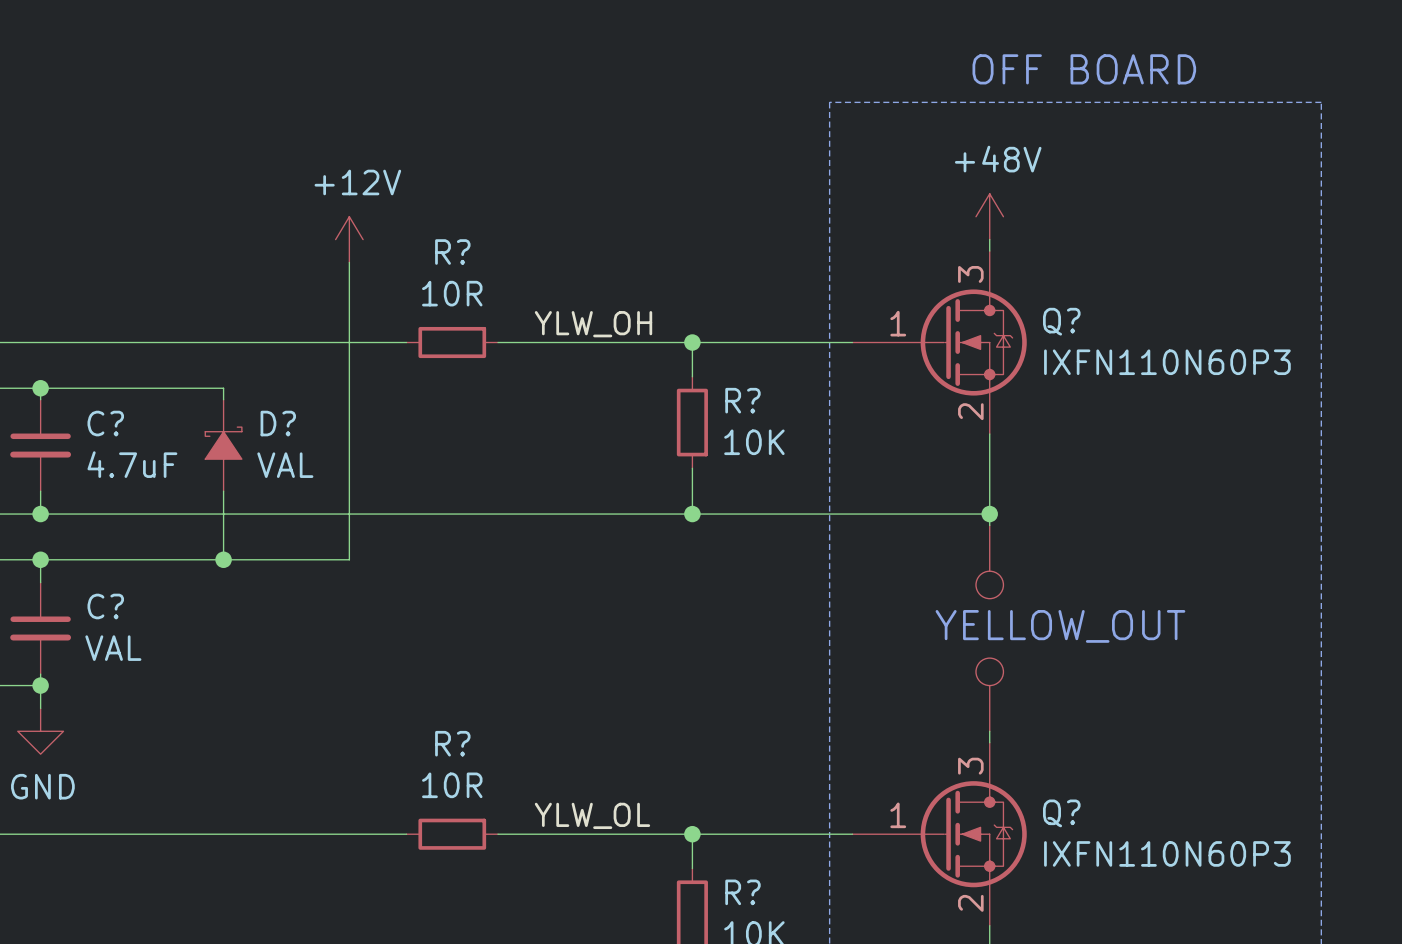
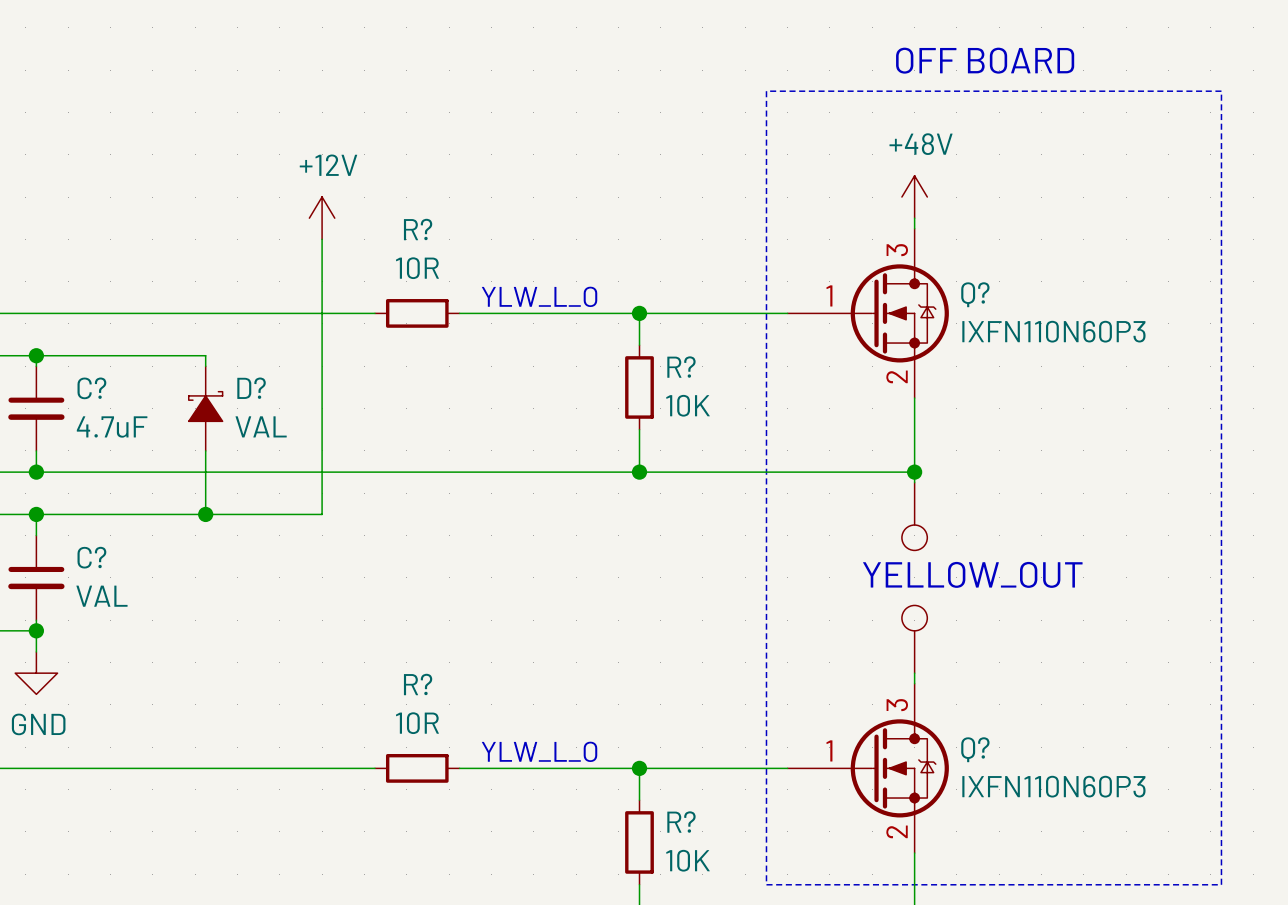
label: YLW_OH (593, 324) -> none
text: none -> YLW_L_O (539, 296)
label: YLW_OL (592, 815) -> none
text: none -> YLW_L_O (539, 751)

